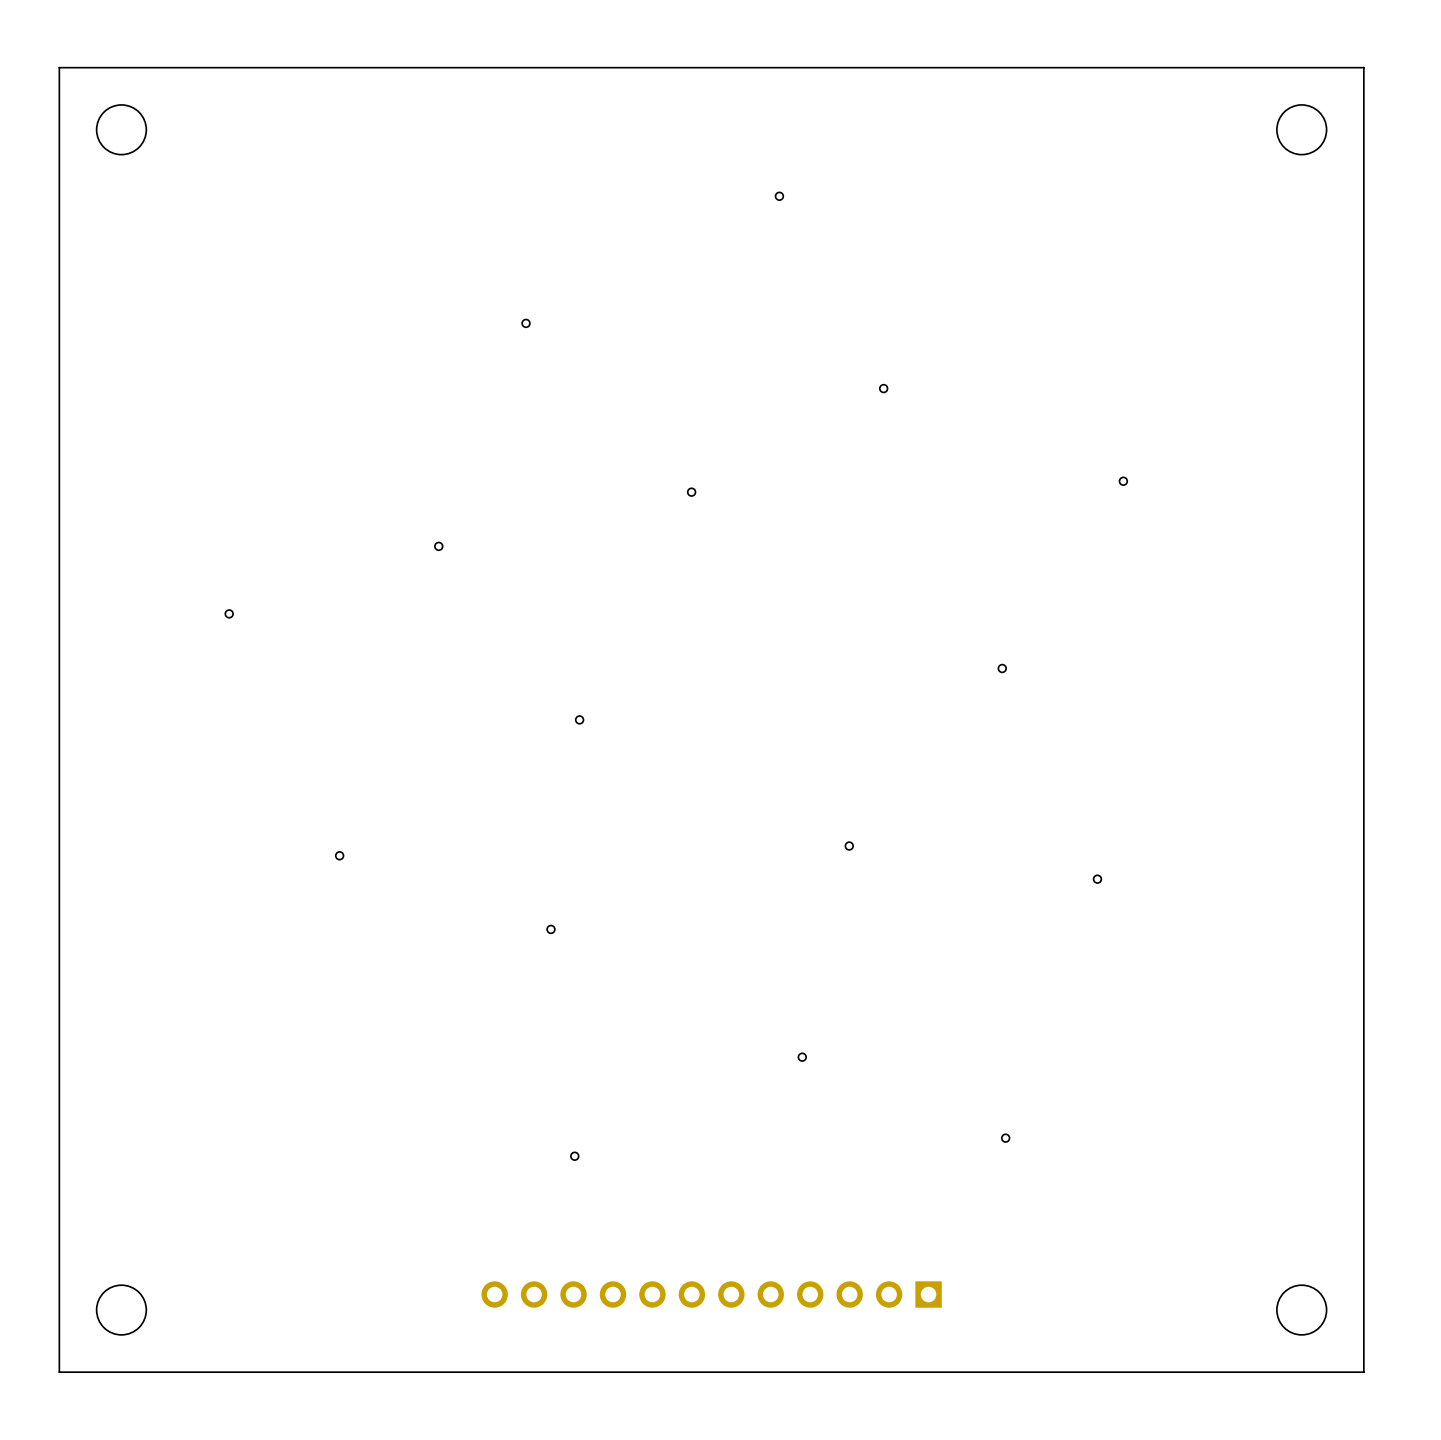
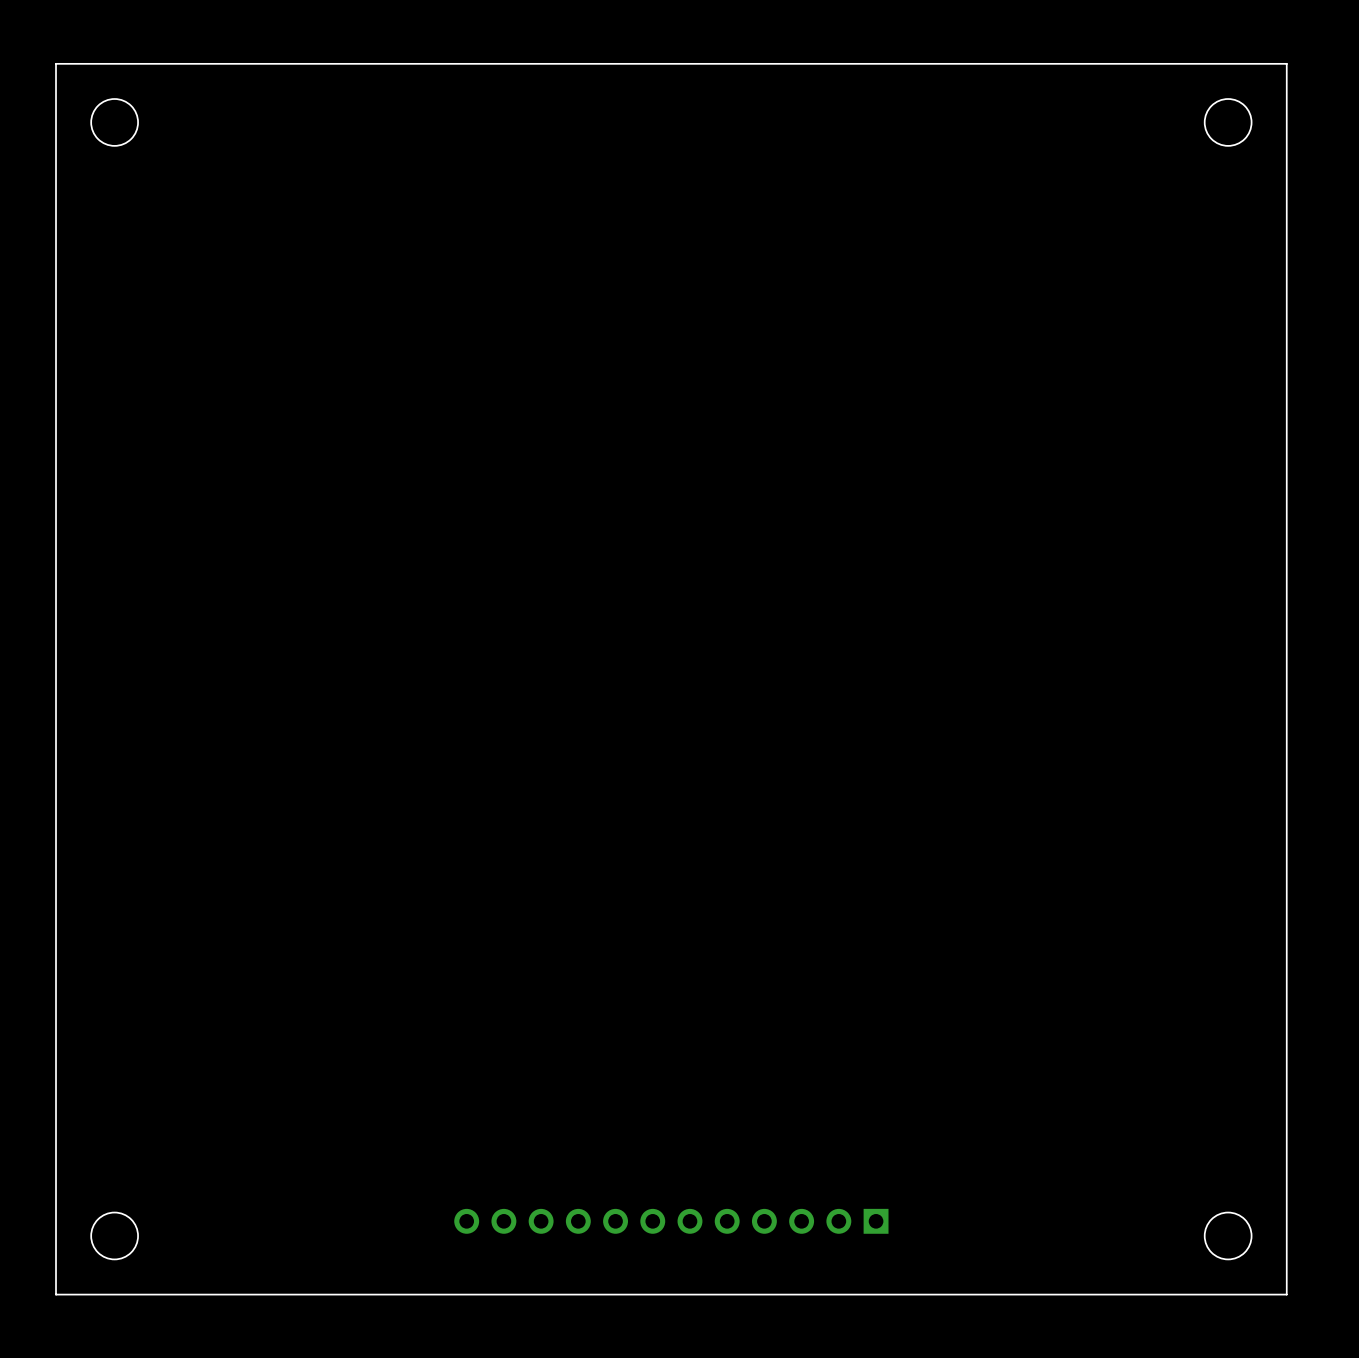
part: (779, 196) -> none
part: (526, 323) -> none
part: (883, 388) -> none
part: (1123, 481) -> none
part: (691, 492) -> none
part: (438, 546) -> none
part: (229, 613) -> none
part: (1002, 668) -> none
part: (579, 719) -> none
part: (849, 846) -> none
part: (339, 855) -> none
part: (1097, 879) -> none
part: (550, 929) -> none
part: (802, 1057) -> none
part: (1005, 1138) -> none
part: (574, 1156) -> none

